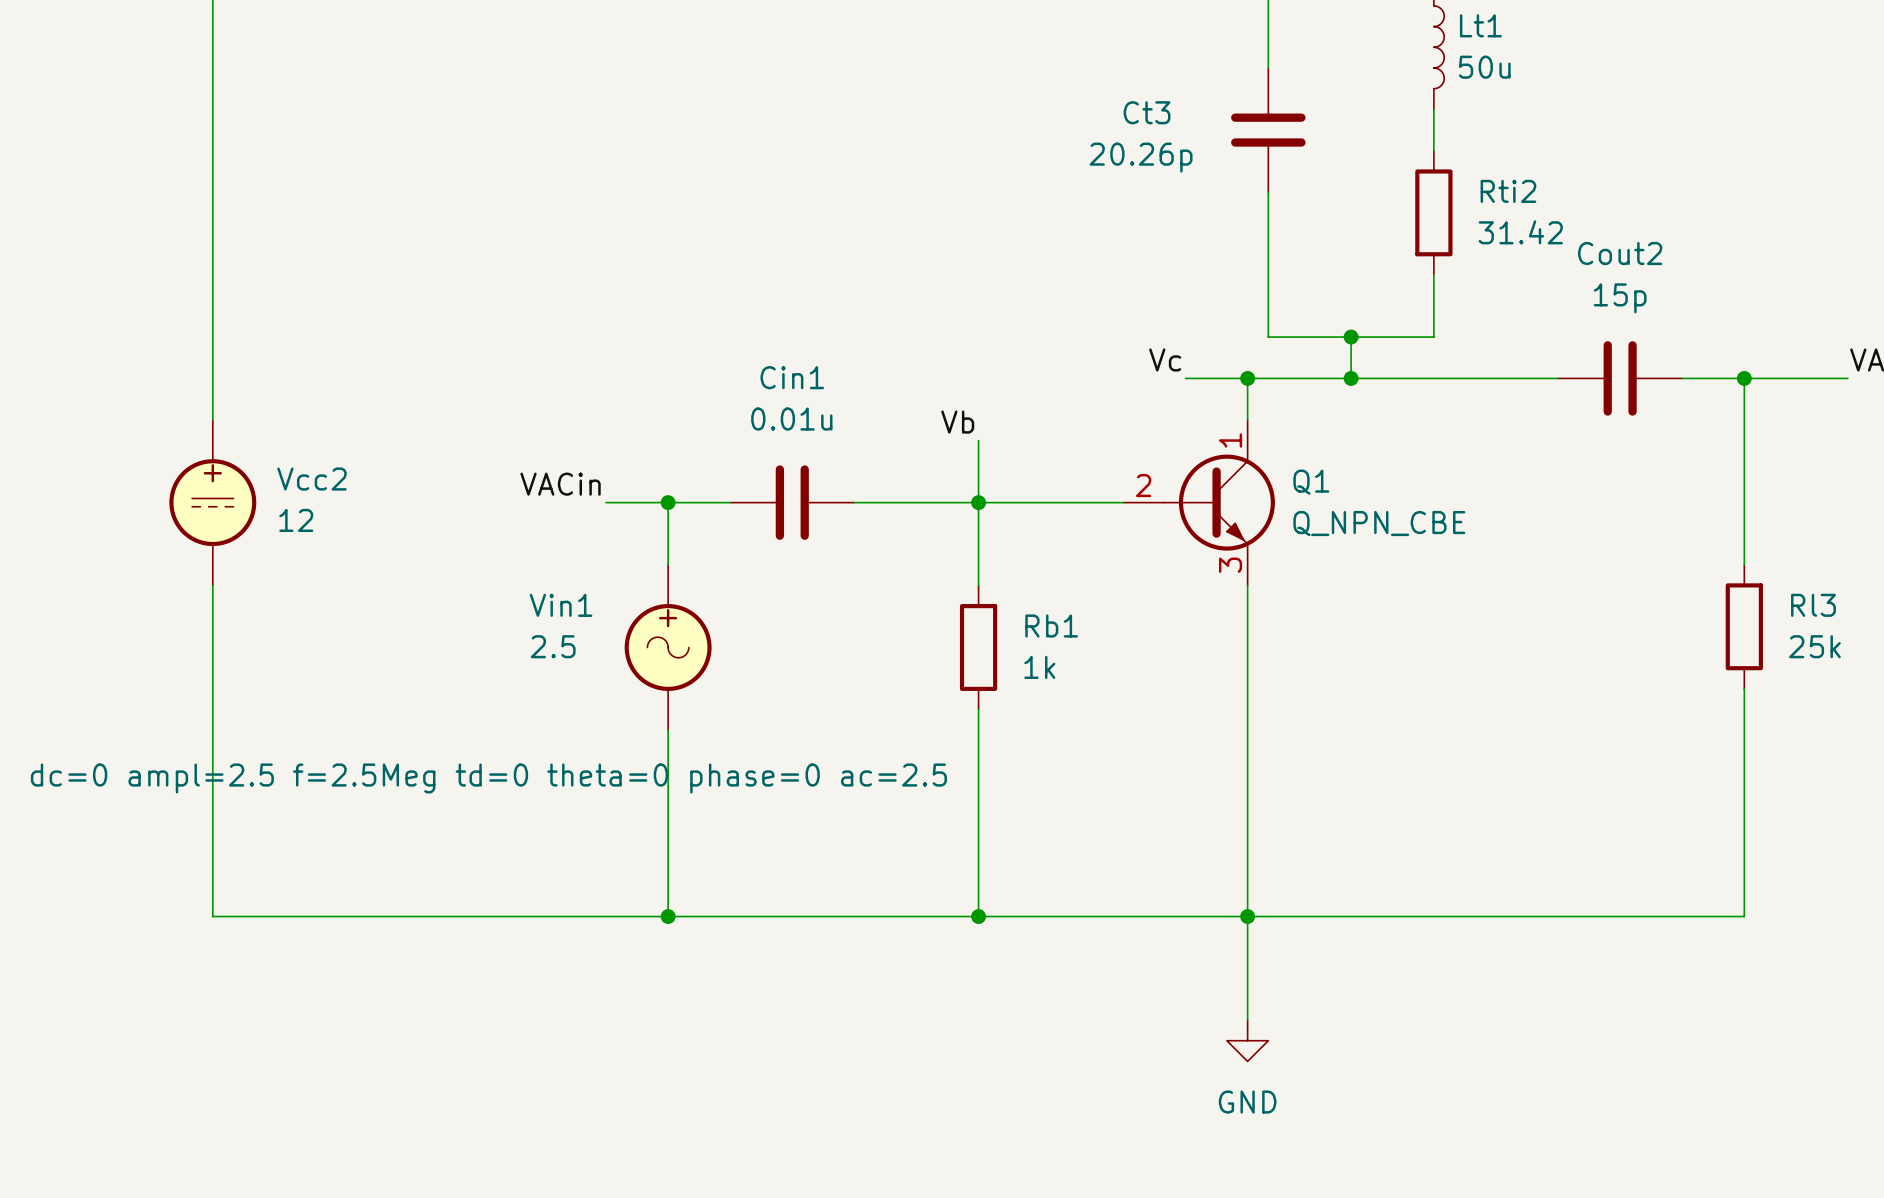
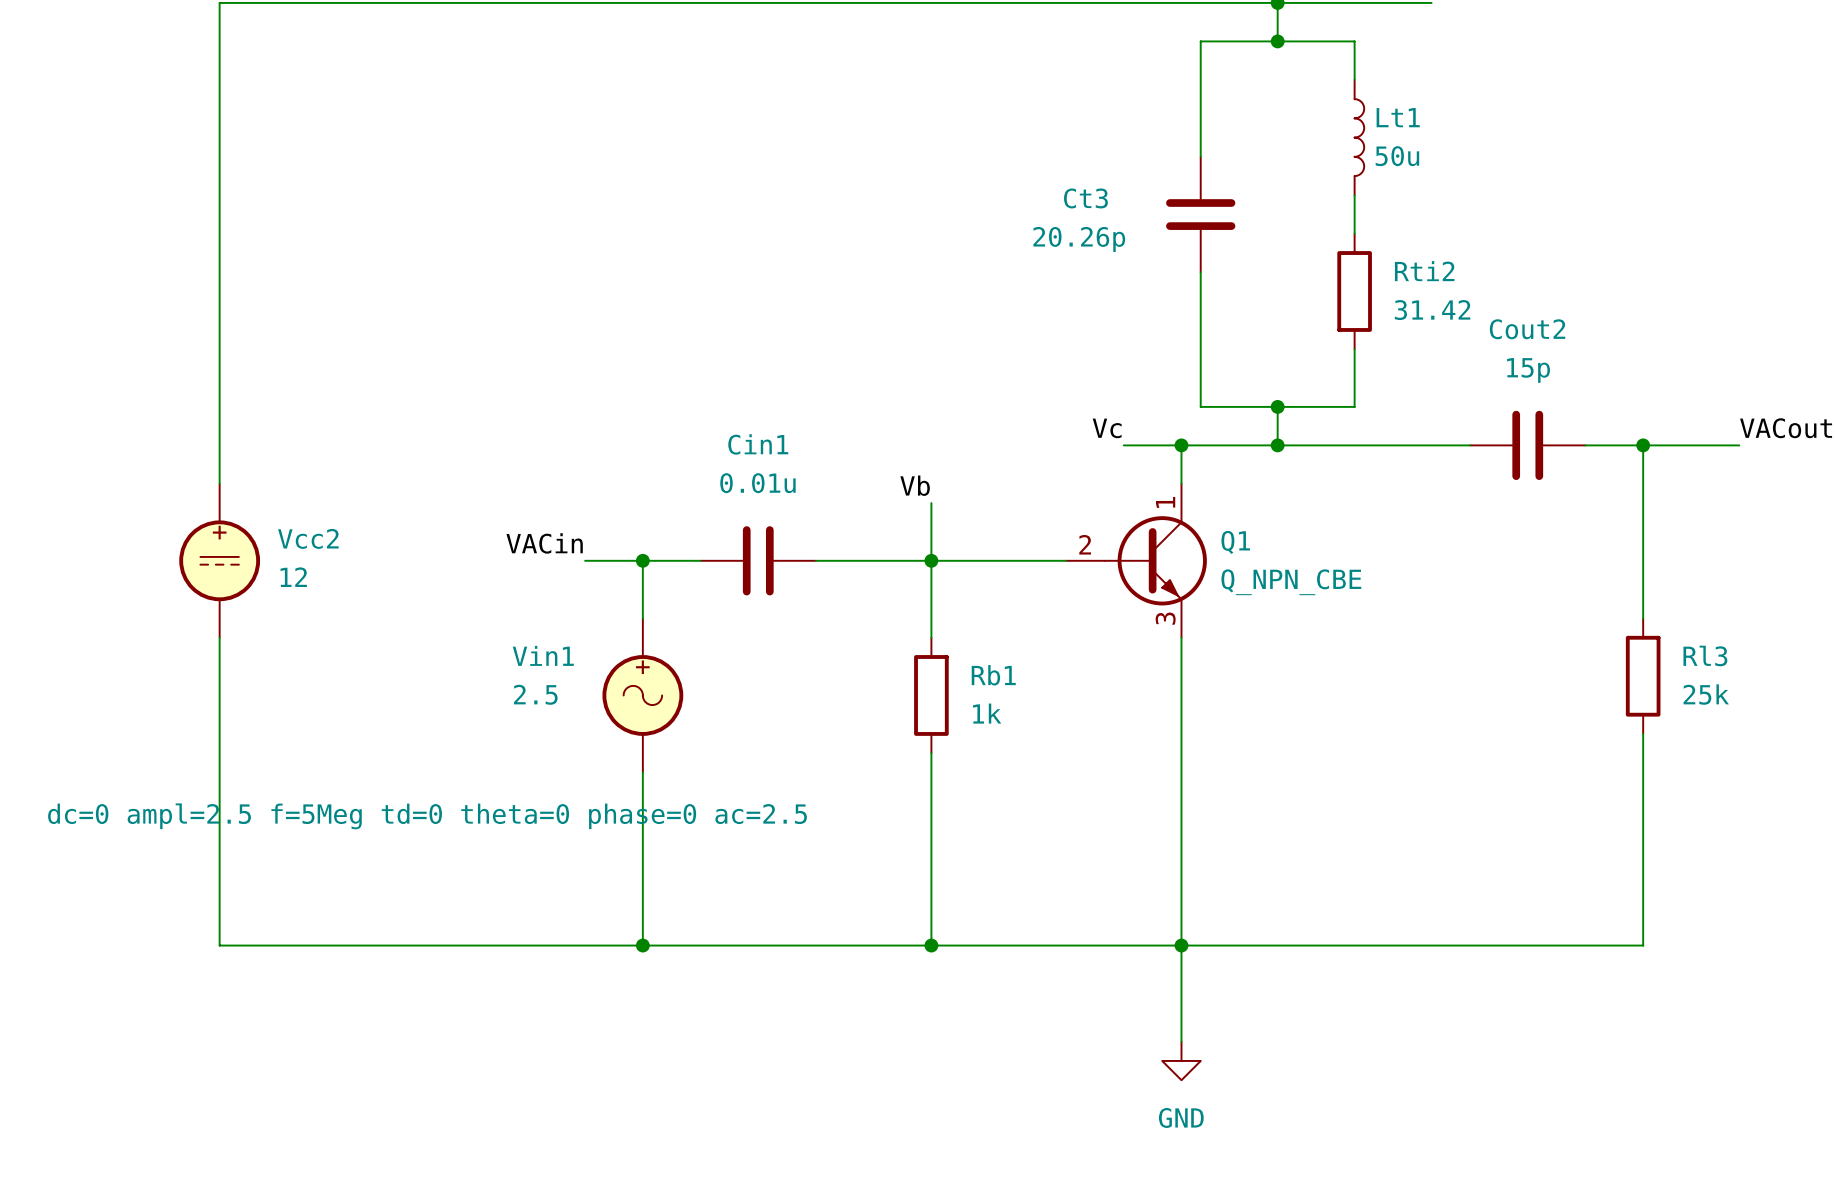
Vin1 text: dc=0 ampl=2.5 f=2.5Meg td=0 theta=0 phase=0 ac=2.5 (488, 778) -> dc=0 ampl=2.5 f=5Meg td=0 theta=0 phase=0 ac=2.5 (427, 816)

